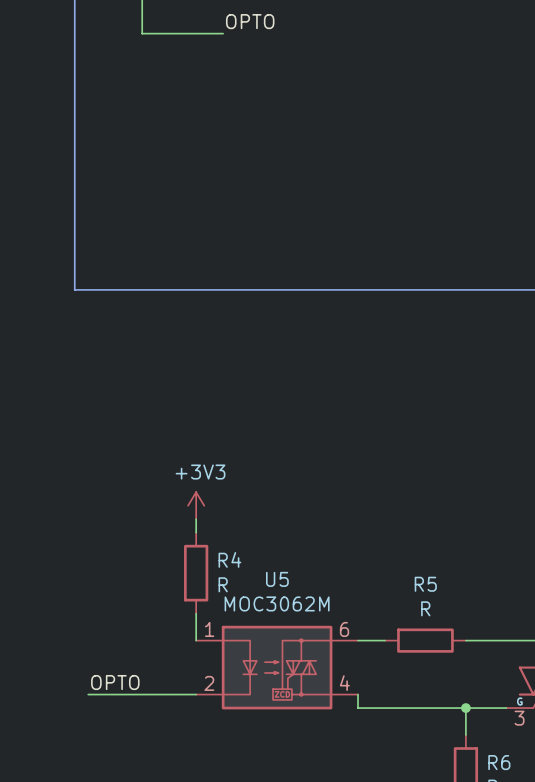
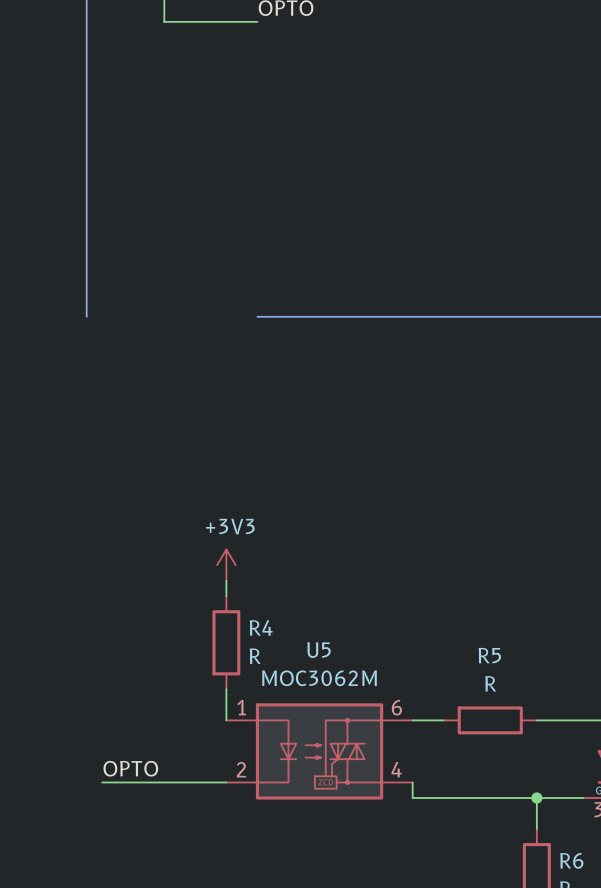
bus: (74, 289) (223, 289) -> none

